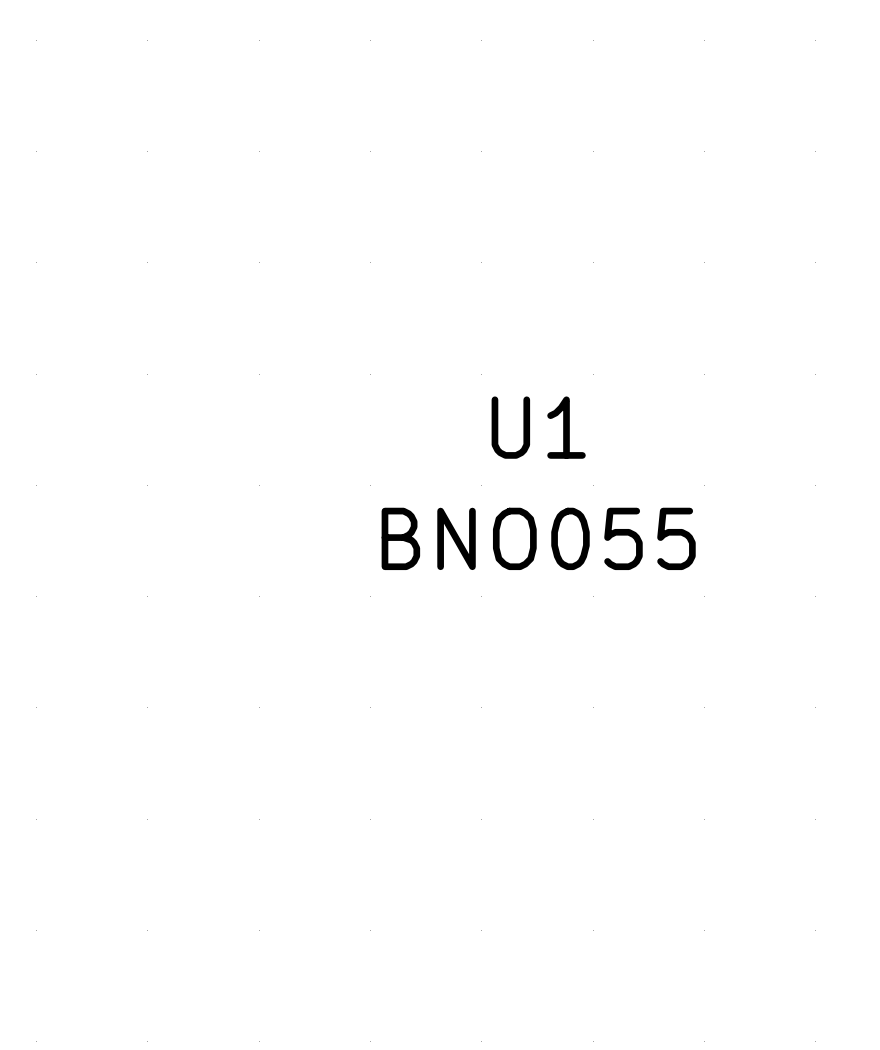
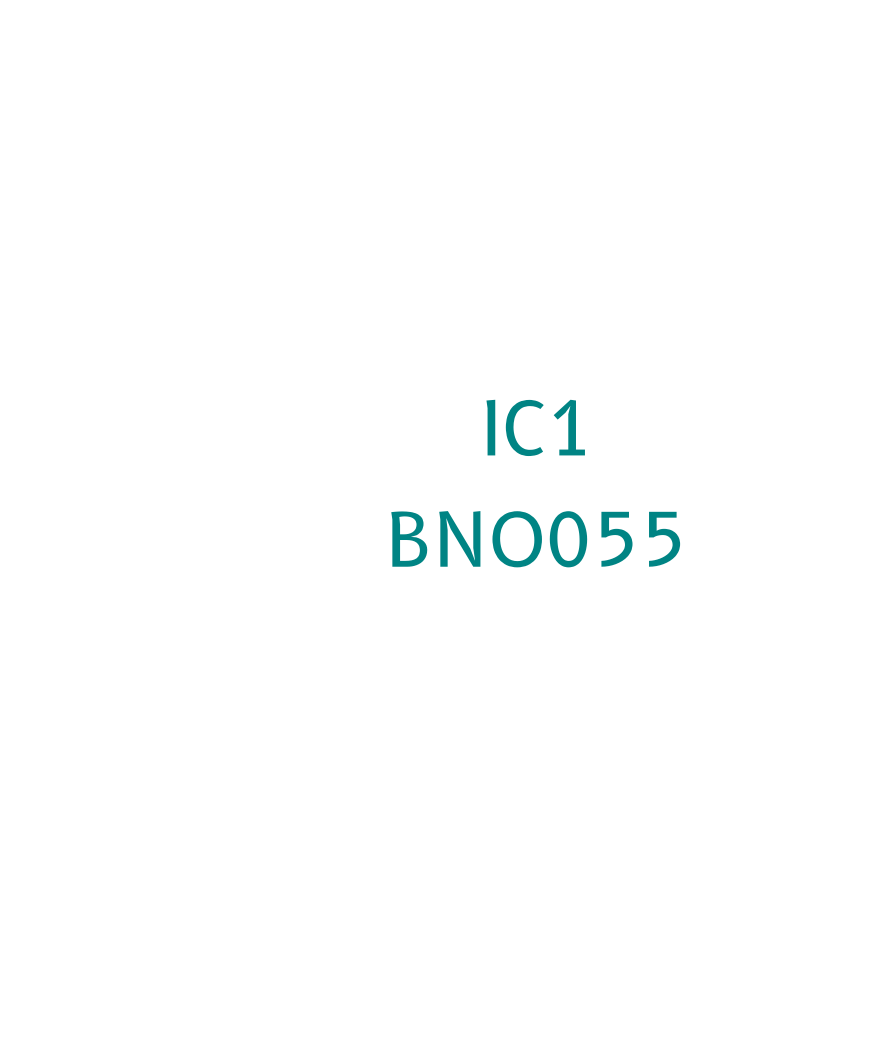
U1 name: U1 (538, 427) -> IC1 (535, 427)

